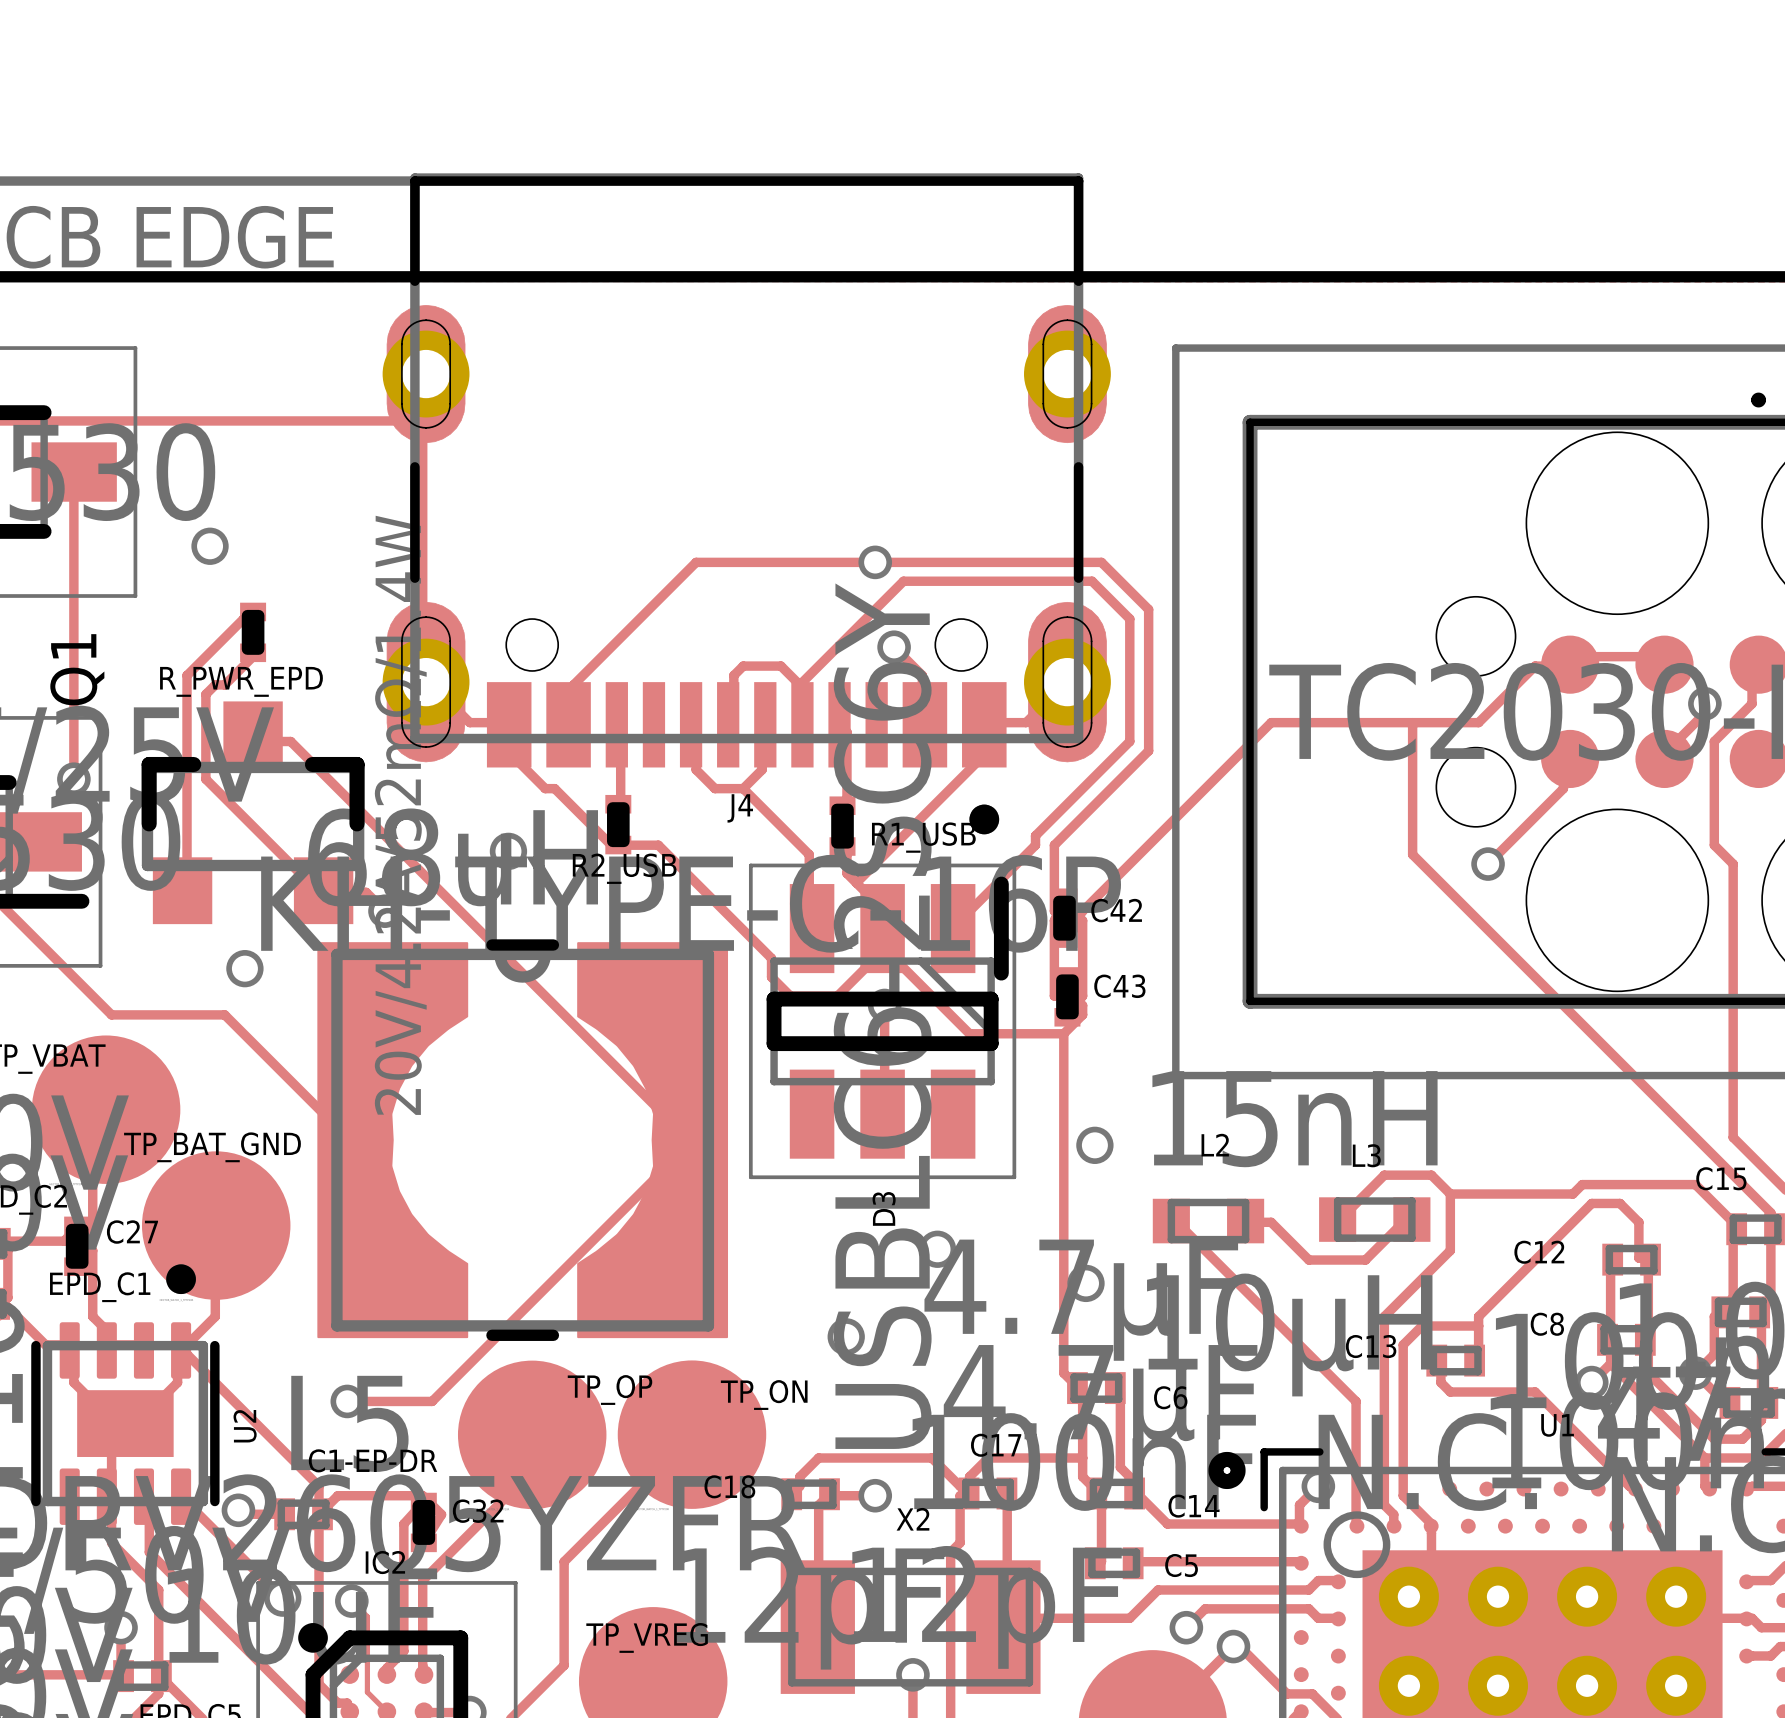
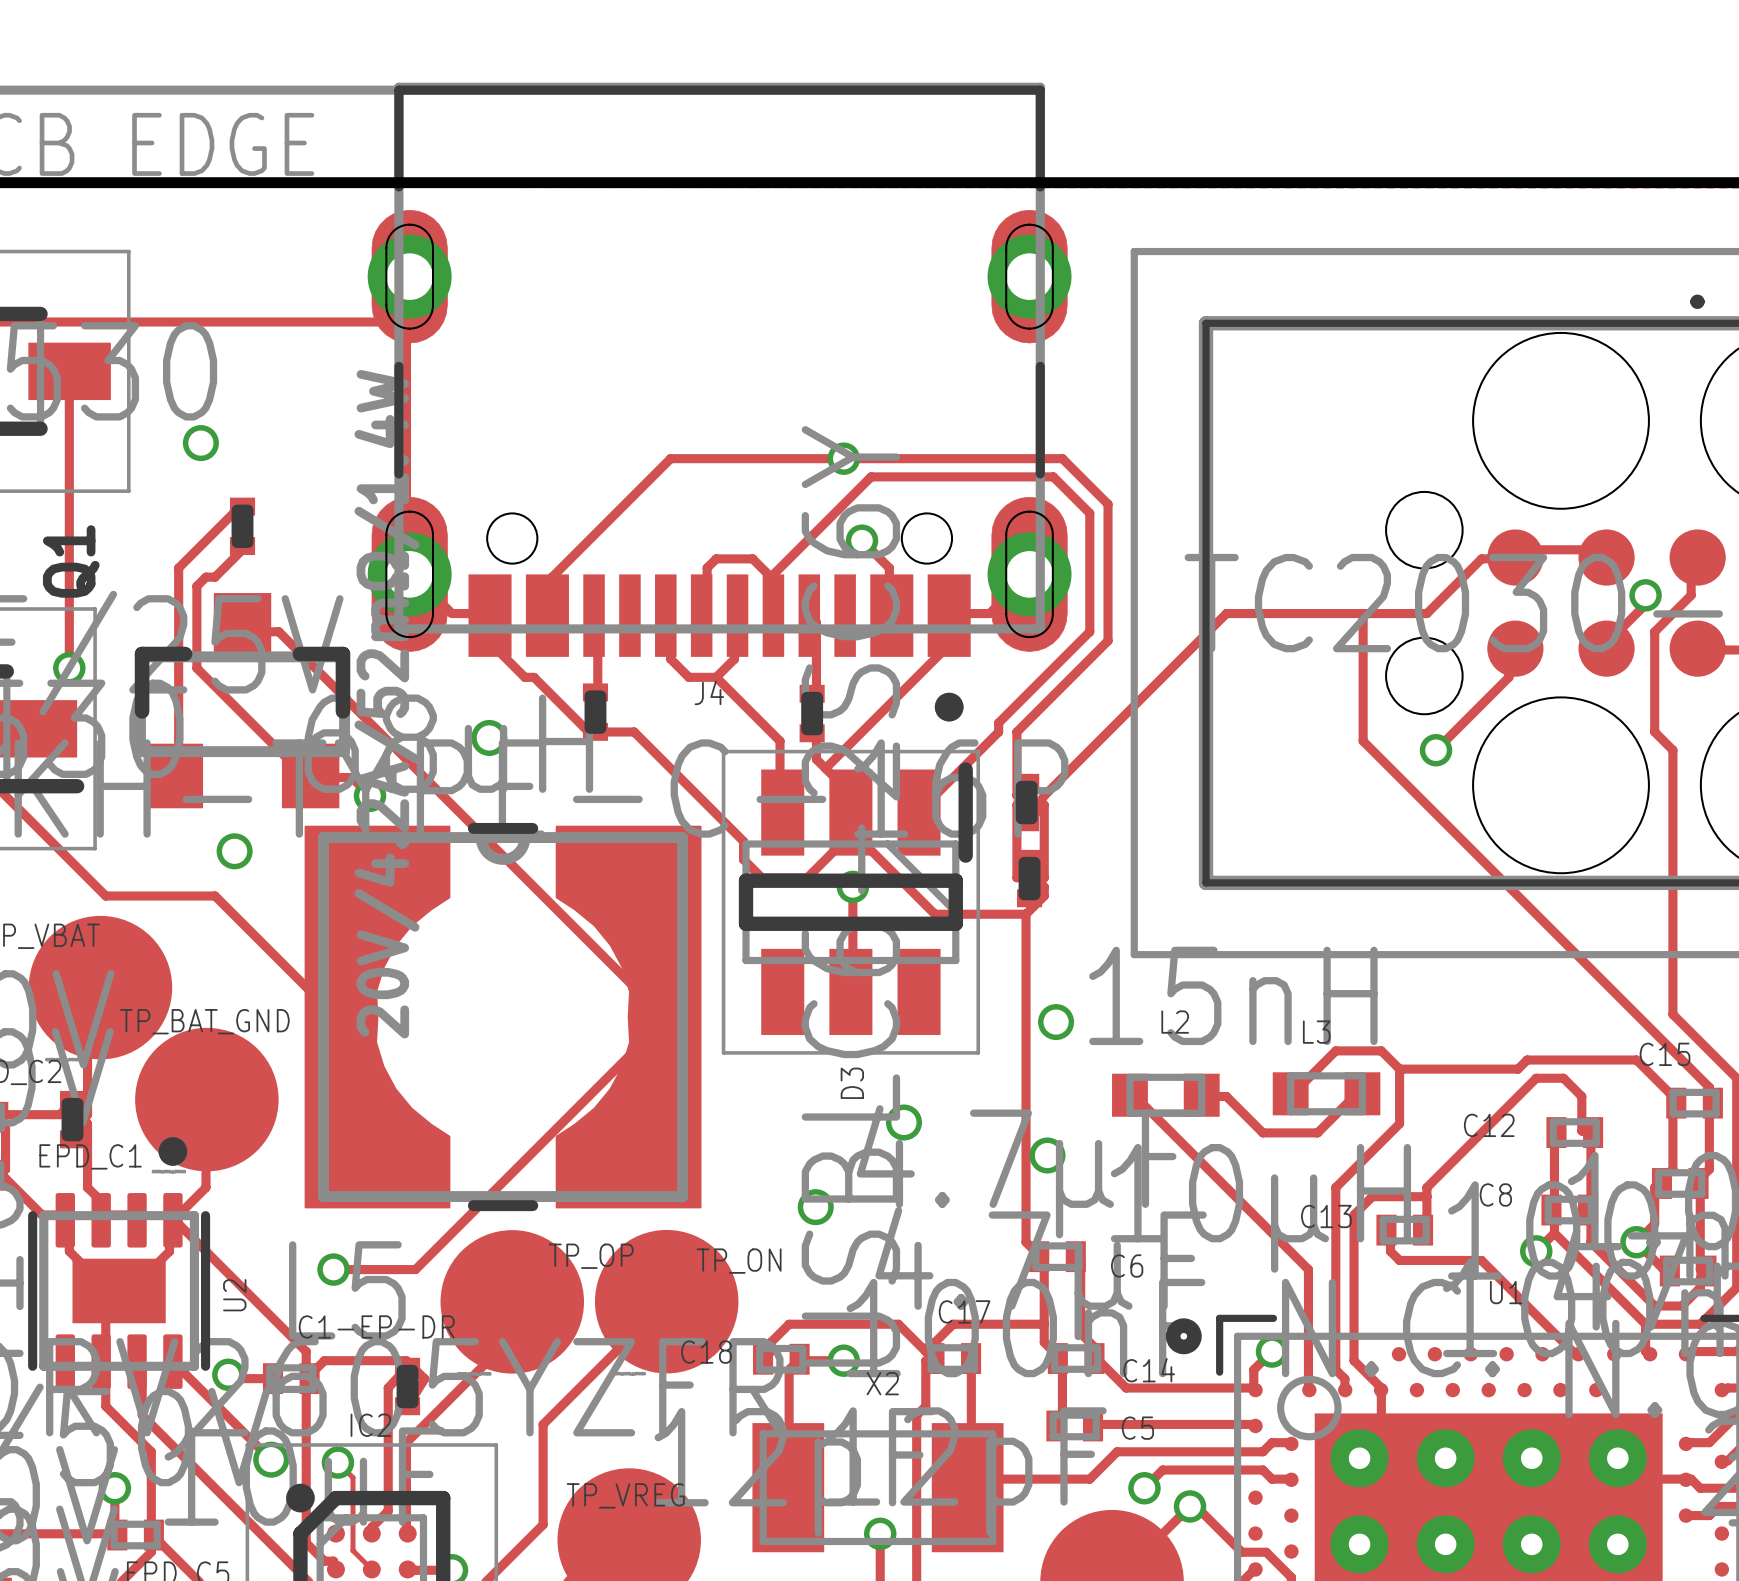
text: R_PWR_EPD (241, 681) -> none
text: R1_USB (923, 837) -> none
text: R2_USB (624, 868) -> none
text: C42 (1116, 910) -> none
text: C43 (1119, 986) -> none
text: C27 (132, 1232) -> none
text: C32 (478, 1511) -> none

